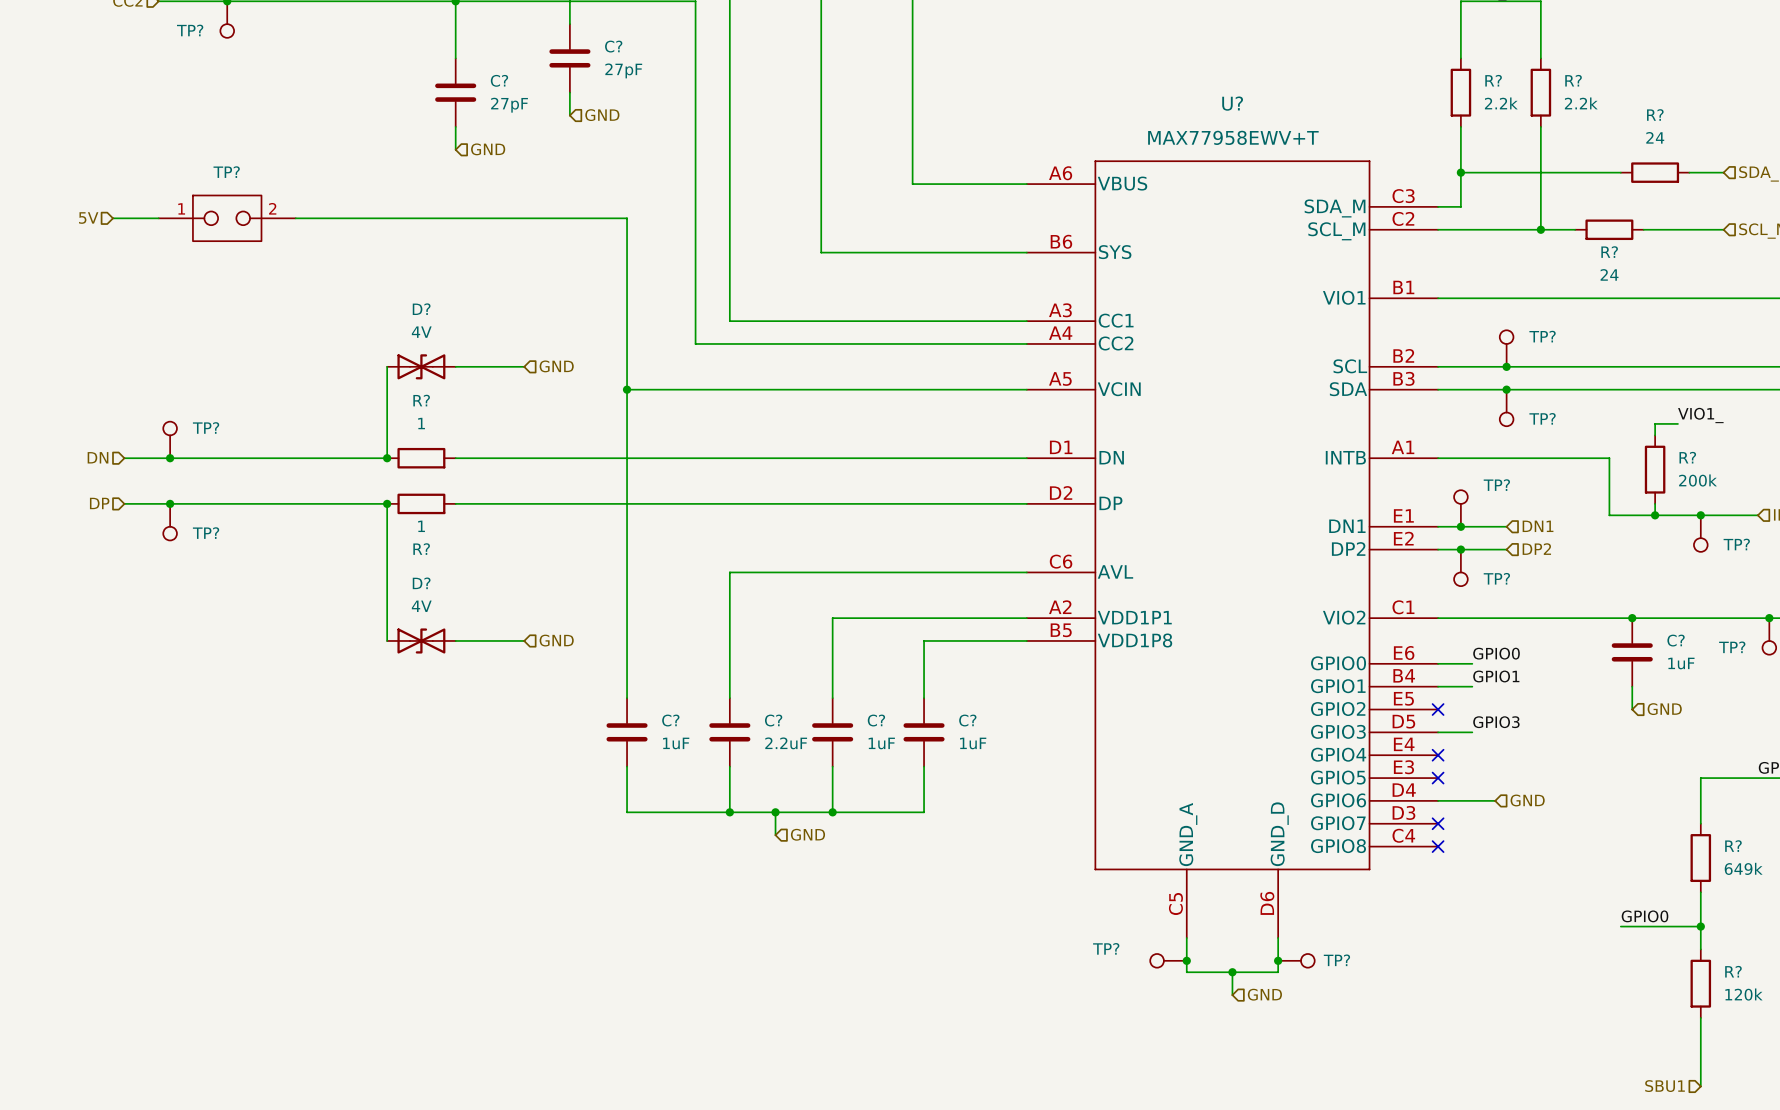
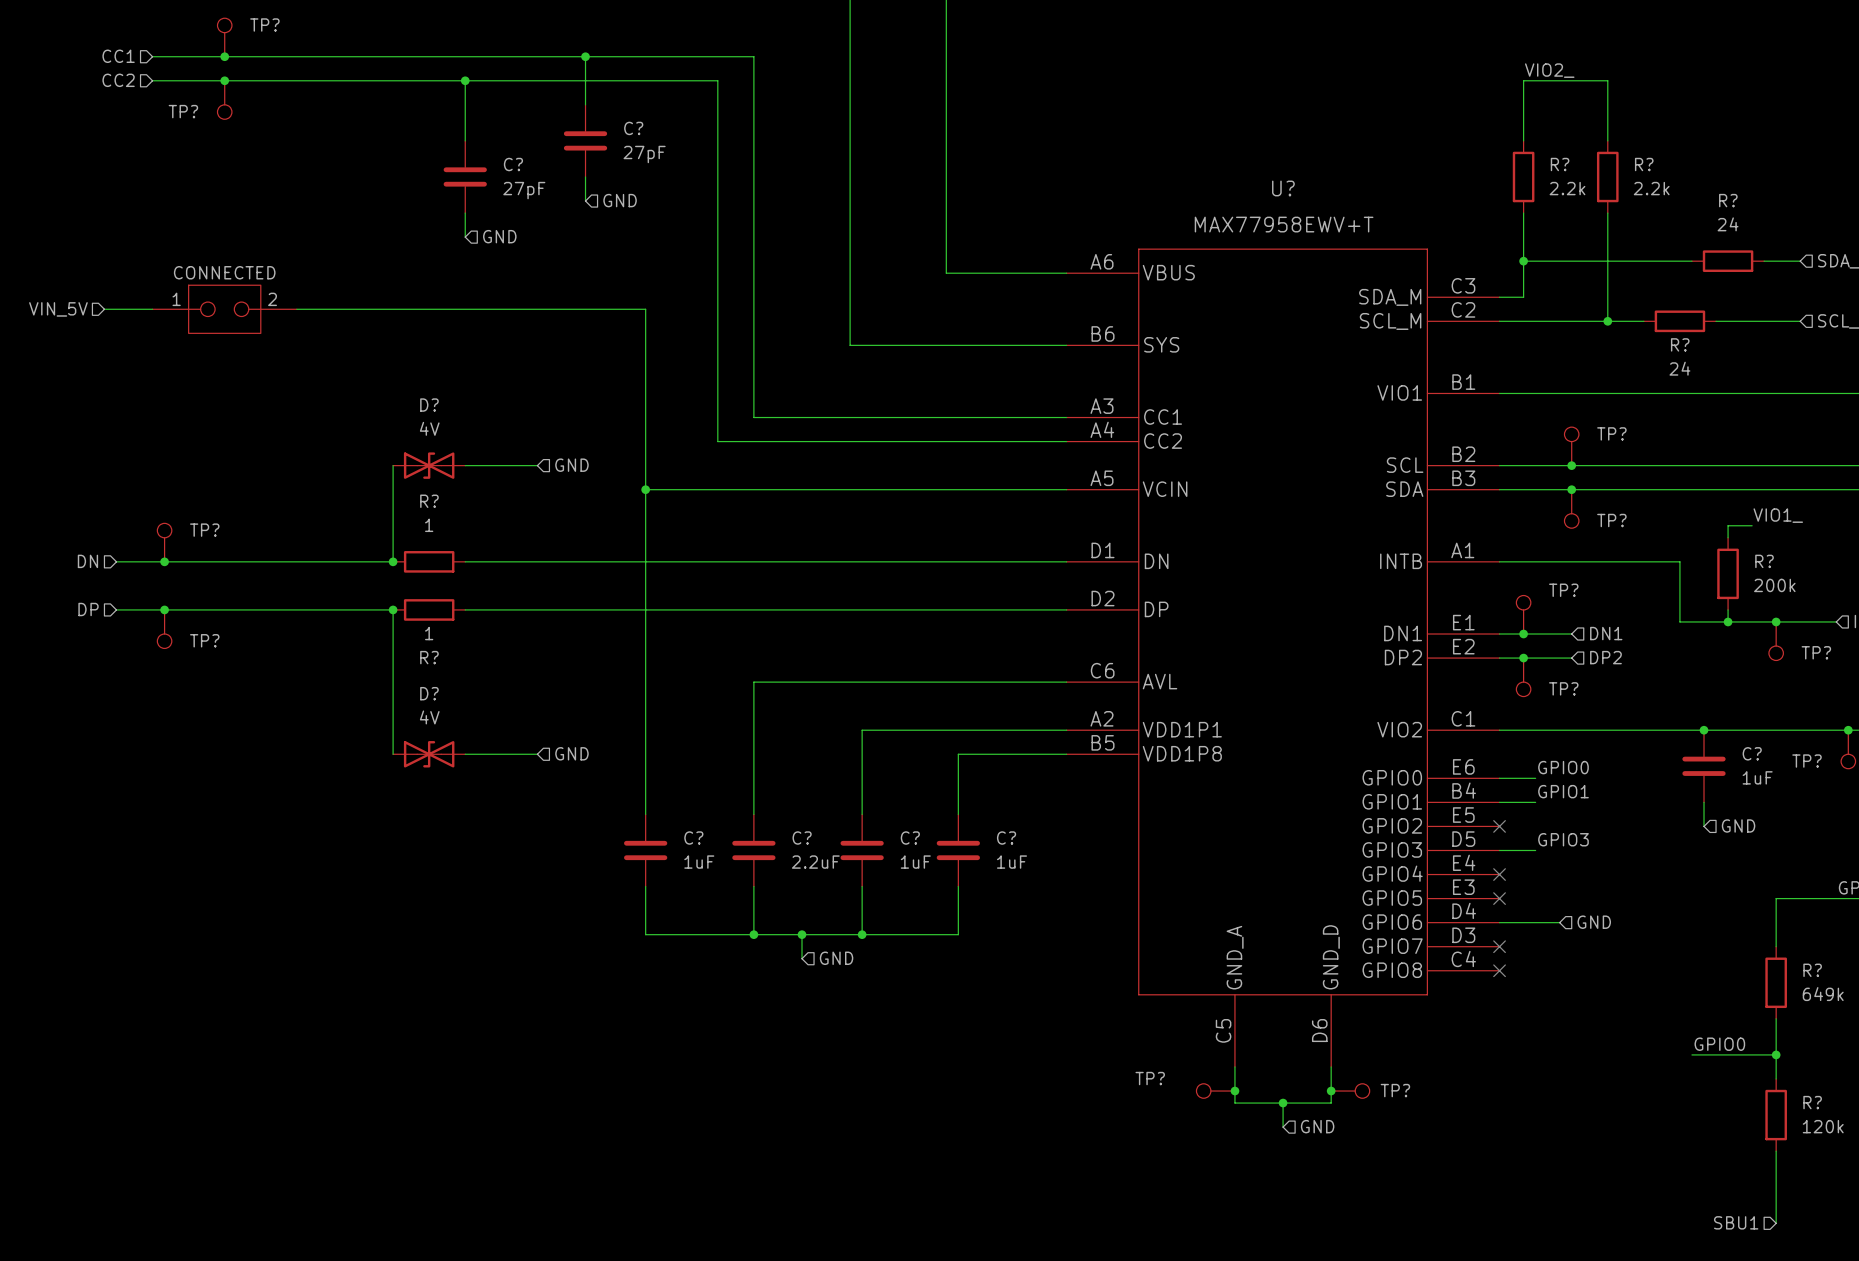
TP? name: TP? (226, 172) -> none
TP? value: none -> CONNECTED (224, 272)
hierarchical label: 5V (88, 218) -> VIN_5V (58, 309)

